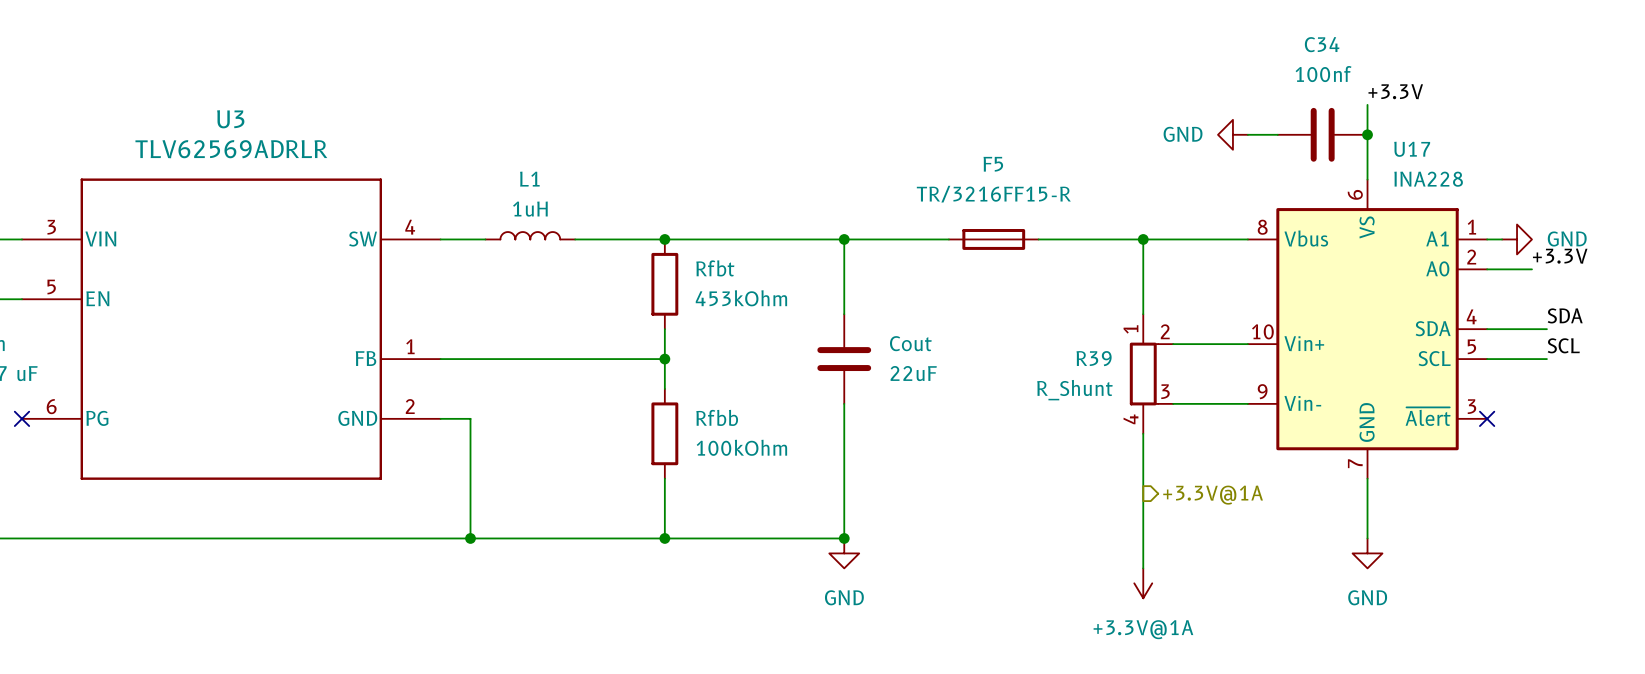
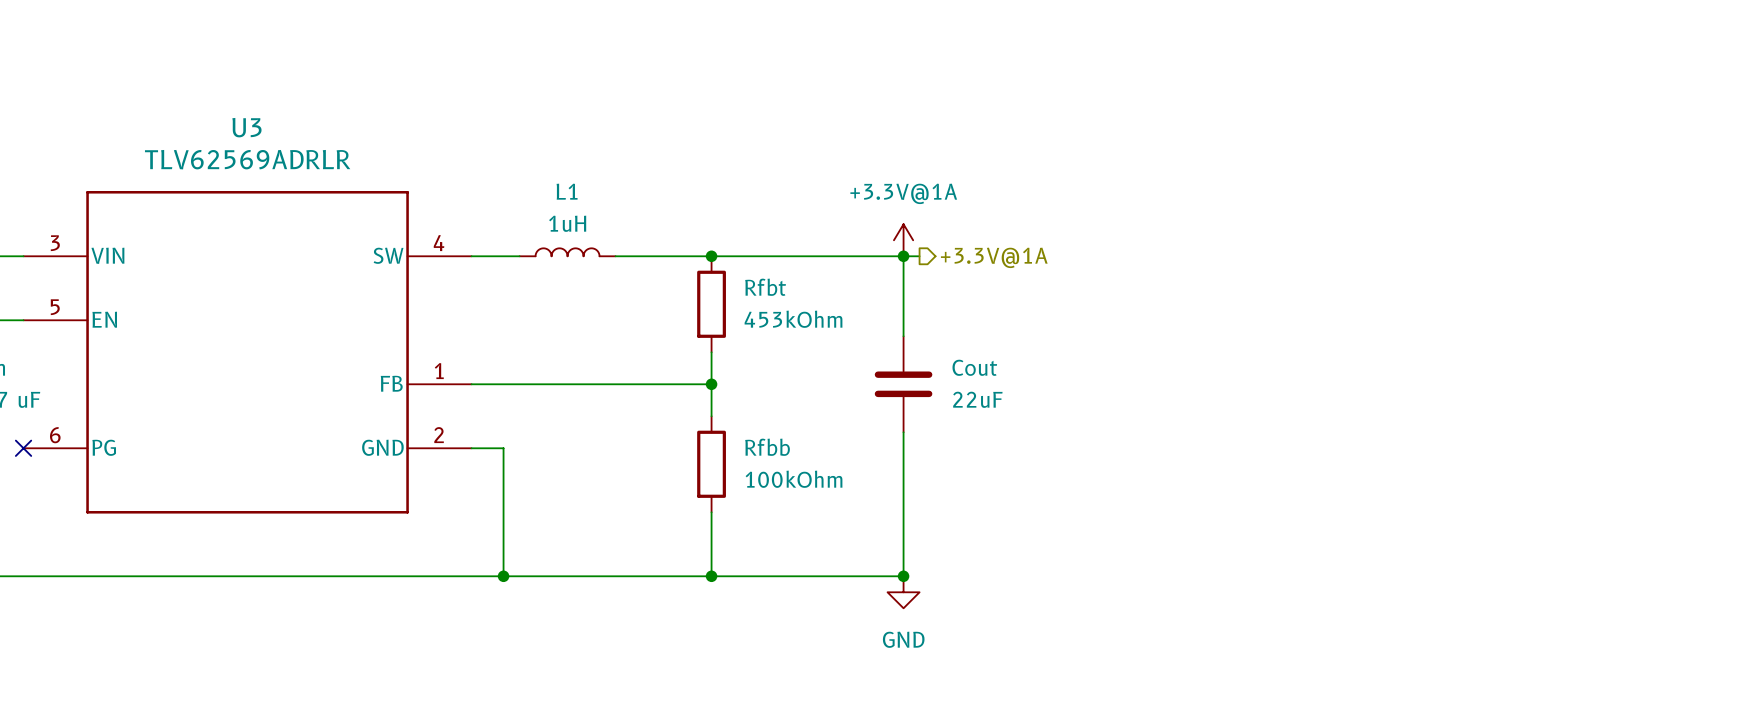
label: +3.3V (1395, 91) -> none
wire: (1367, 104) (1367, 179) -> none
power symbol: GND (1232, 134) -> none
wire: (1247, 134) (1277, 134) -> none
C34: 100nf (1322, 134) -> none
junction: (1367, 134) -> none
power symbol: none -> +3.3V@1A (903, 240)
wire: (859, 239) (948, 239) -> none
F5: TR/3216FF15-R (993, 239) -> none
wire: (1038, 239) (1247, 239) -> none
wire: (1143, 239) (1143, 314) -> none
junction: (1143, 239) -> none
wire: (1487, 239) (1502, 239) -> none
power symbol: GND (1517, 239) -> none
hierarchical label: none -> +3.3V@1A (994, 257)
label: +3.3V (1560, 256) -> none
wire: (1487, 269) (1531, 269) -> none
label: SDA (1565, 315) -> none
U17: INA228 (1367, 329) -> none
wire: (1487, 329) (1546, 329) -> none
wire: (1173, 344) (1247, 344) -> none
label: SCL (1563, 345) -> none
wire: (1487, 359) (1546, 359) -> none
R39: R_Shunt (1151, 374) -> none
wire: (1173, 403) (1247, 403) -> none
no-connect mark: (1487, 418) -> none
wire: (1143, 433) (1143, 568) -> none
wire: (1367, 478) (1367, 538) -> none
hierarchical label: +3.3V@1A (1213, 495) -> none
power symbol: GND (1367, 553) -> none
power symbol: +3.3V@1A (1143, 583) -> none

